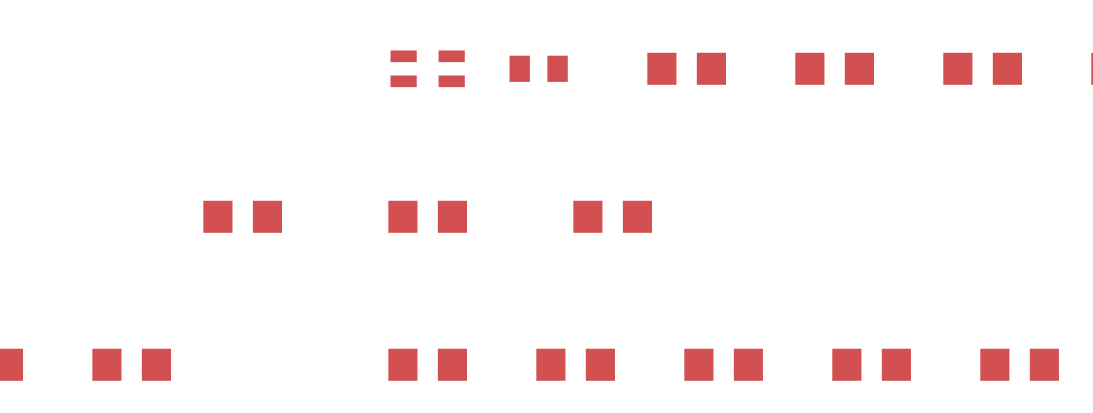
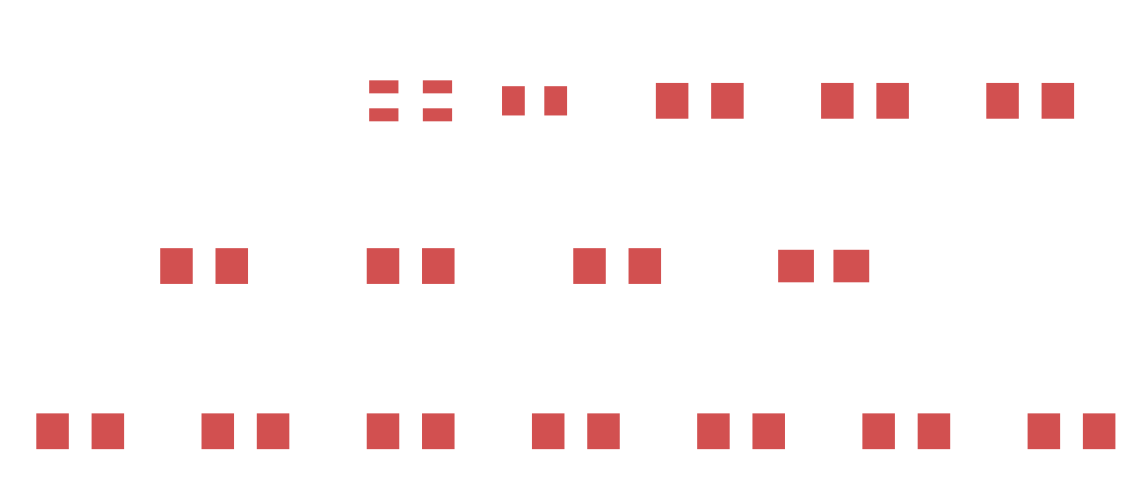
part: none -> (823, 266)
part: none -> (245, 431)

